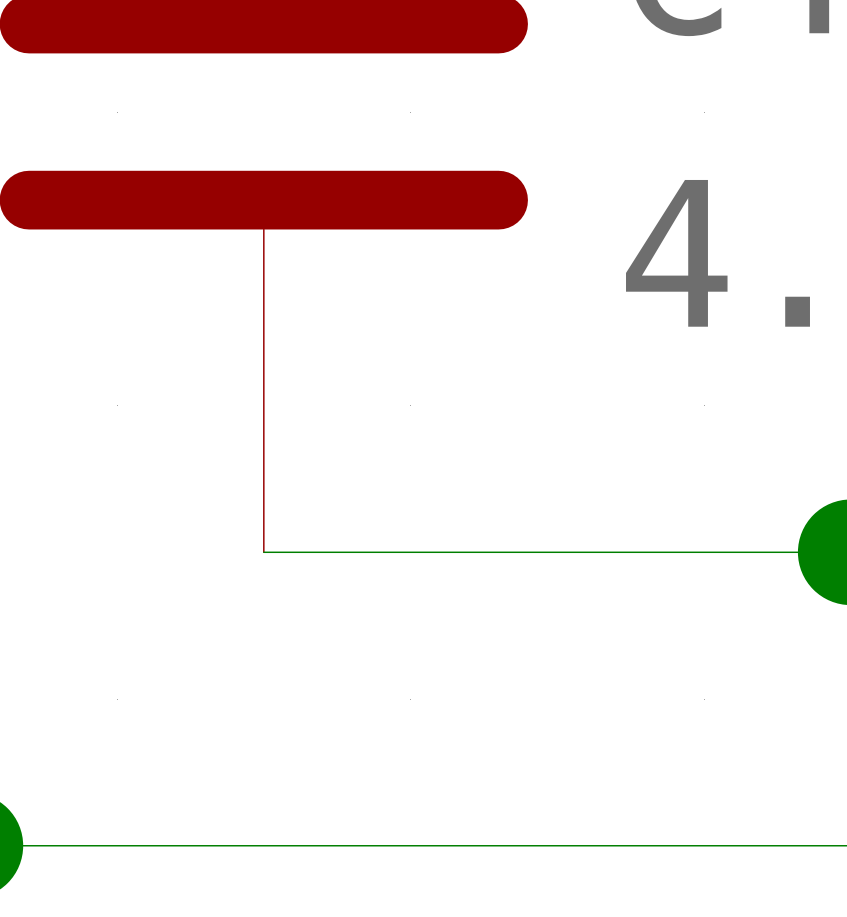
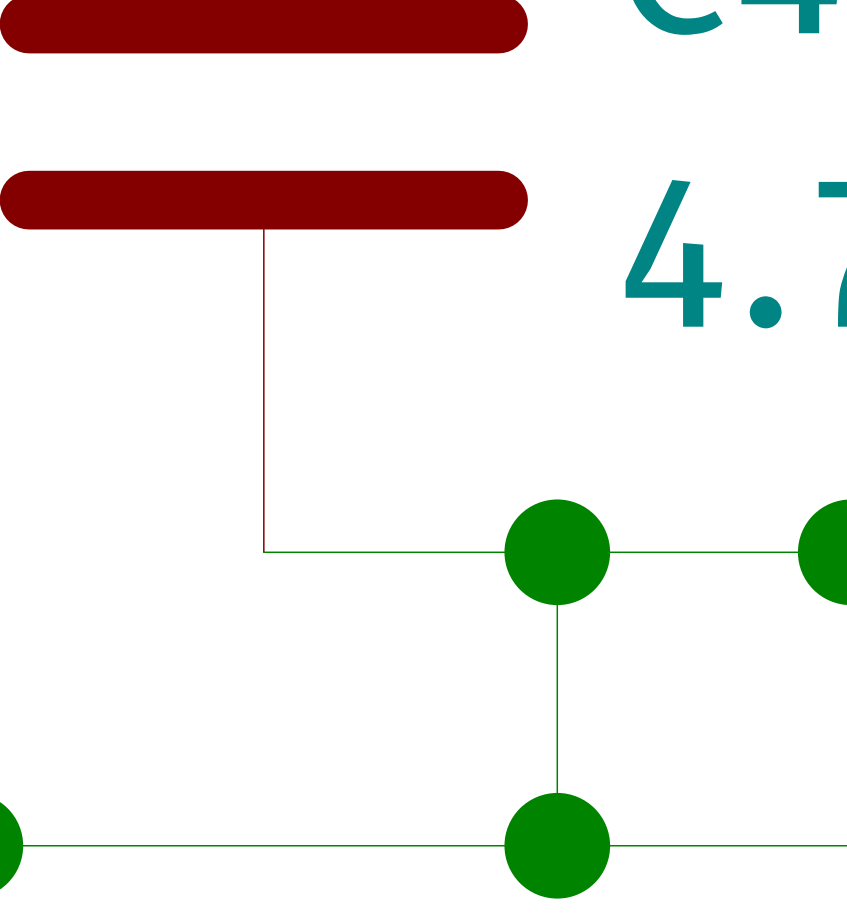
wire: none -> (557, 552) (557, 845)
junction: none -> (557, 552)
junction: none -> (557, 845)

